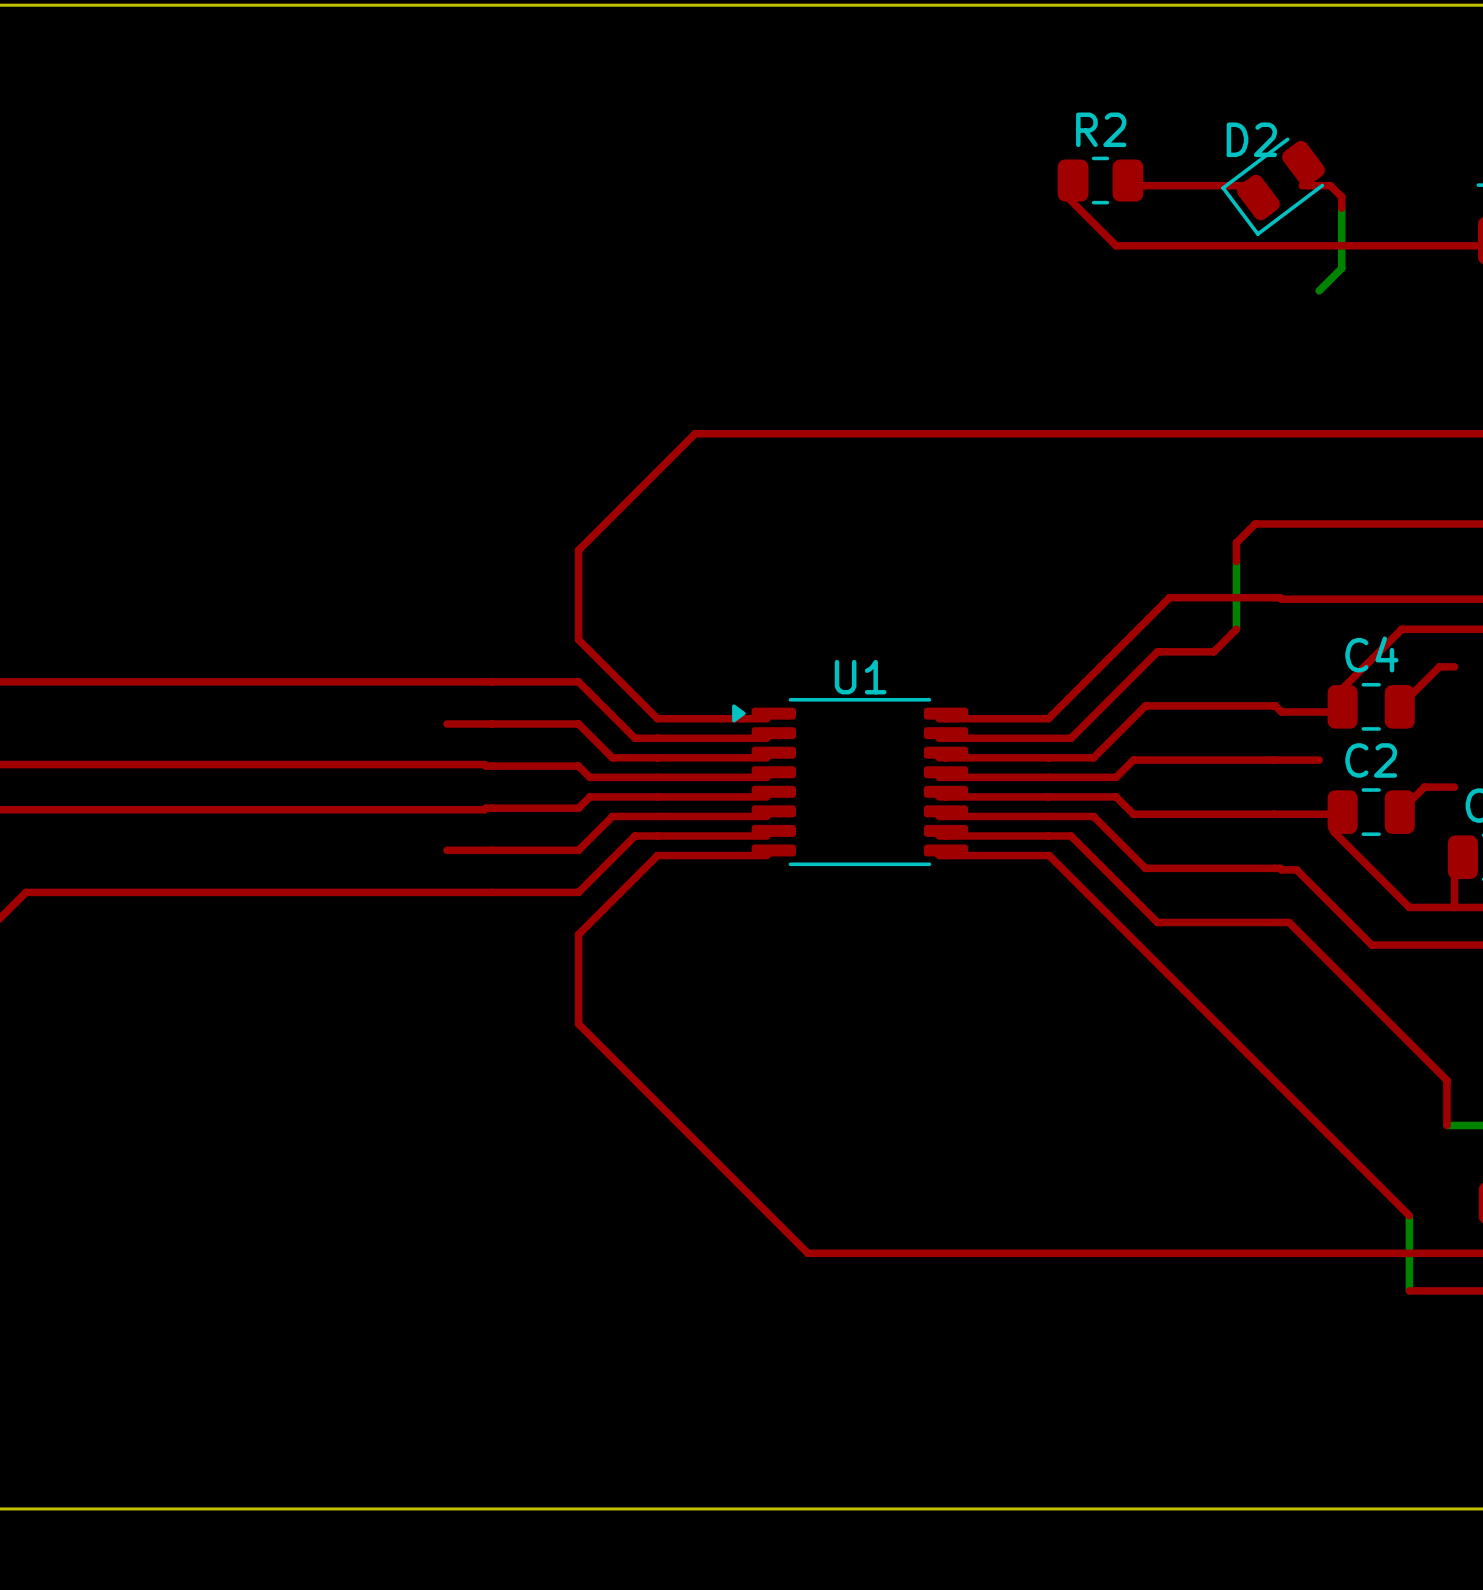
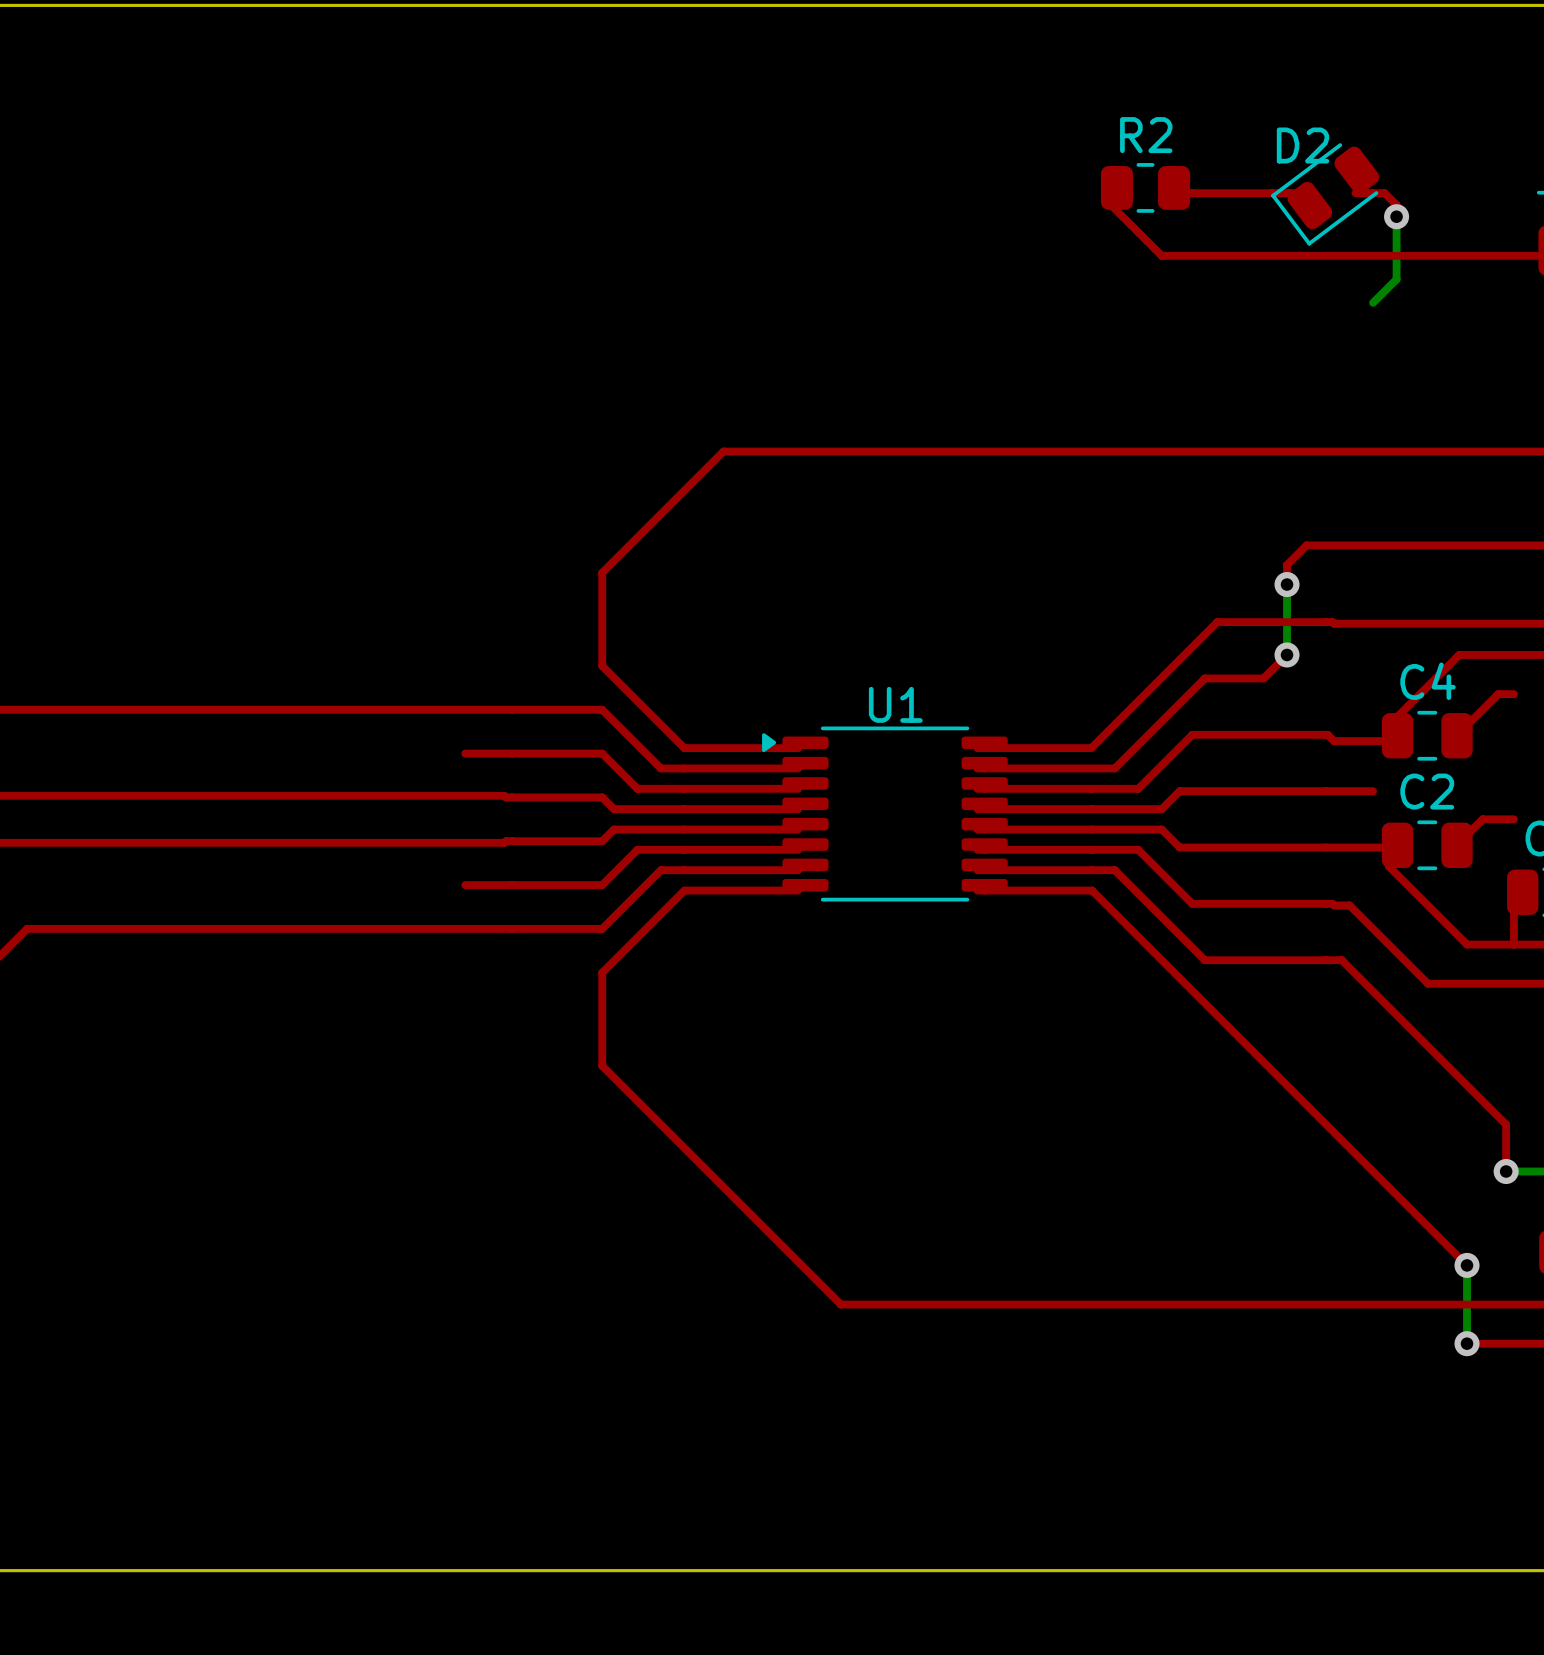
via: none -> (1396, 216)
via: none -> (1287, 584)
via: none -> (1287, 654)
via: none -> (1506, 1171)
via: none -> (1467, 1265)
via: none -> (1467, 1343)

